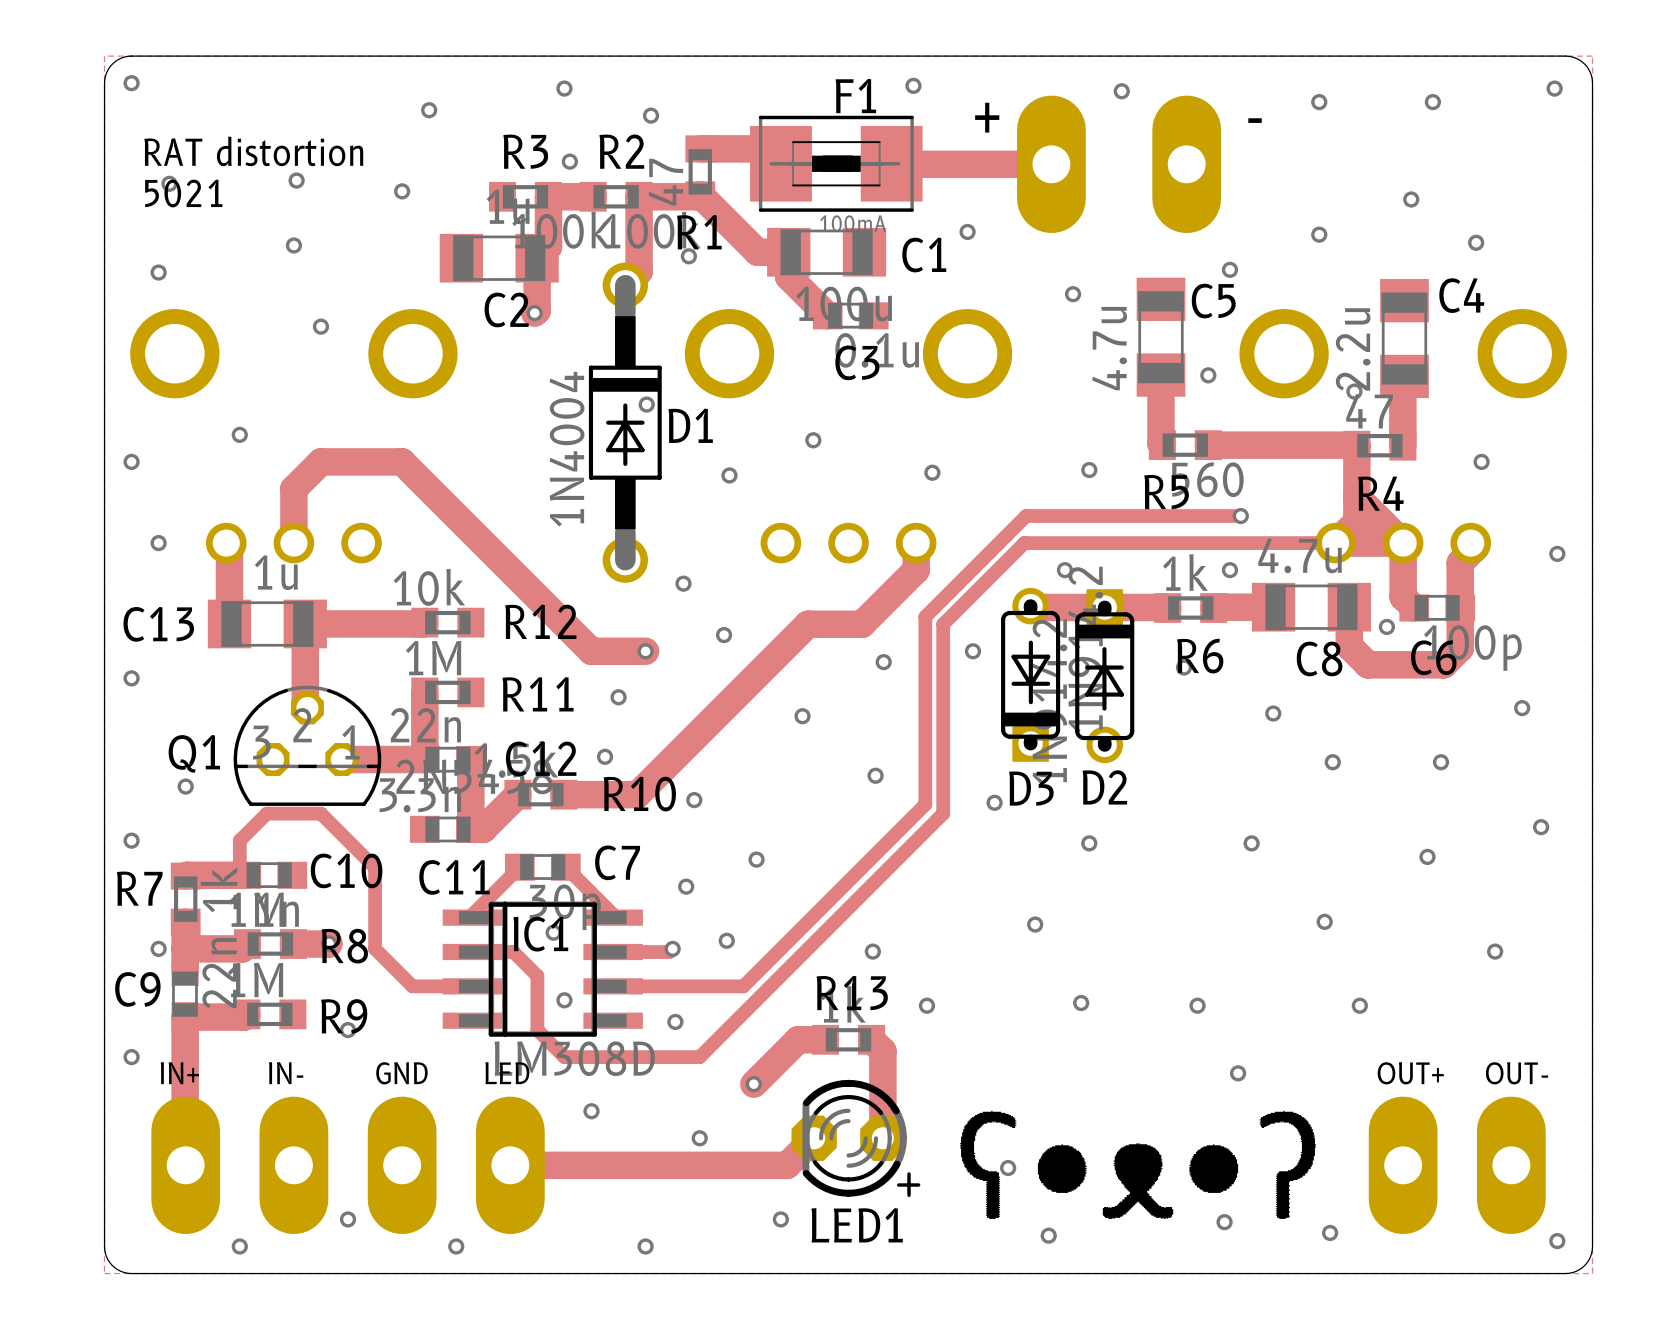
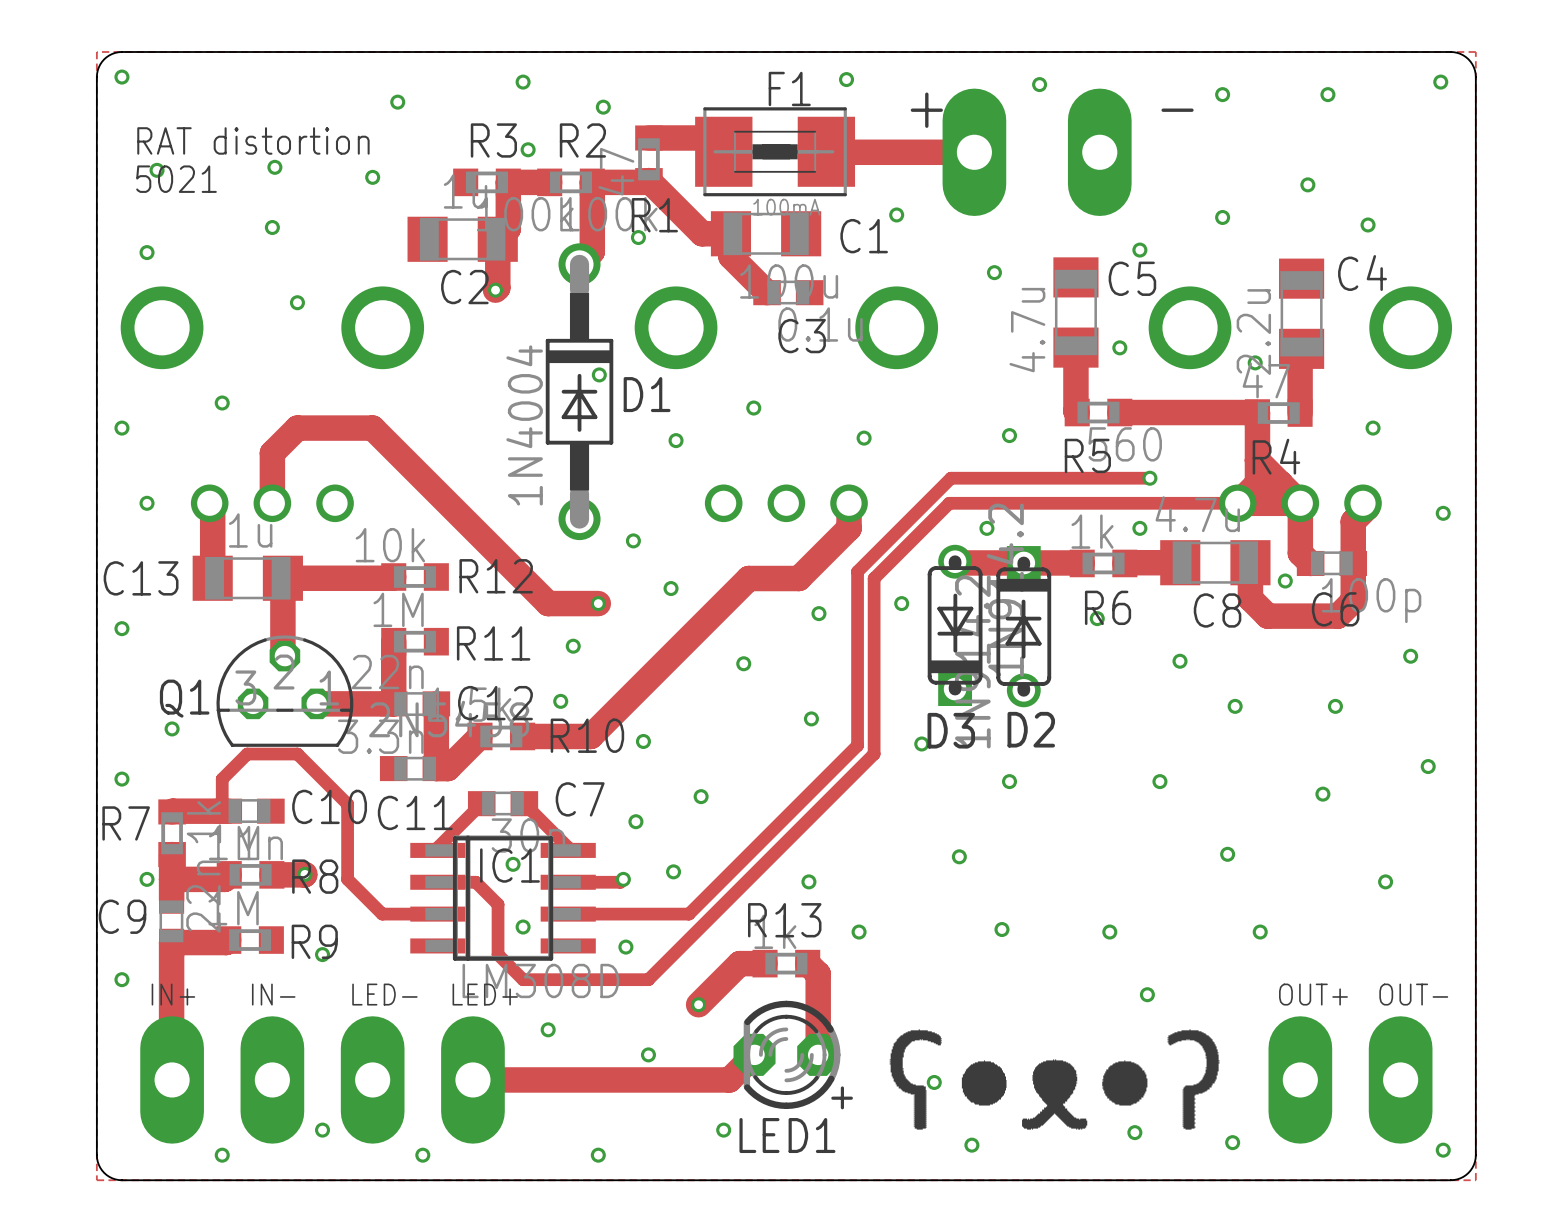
text: GND (401, 1073) -> LED- (384, 994)
text: LED (507, 1073) -> LED+ (485, 994)

